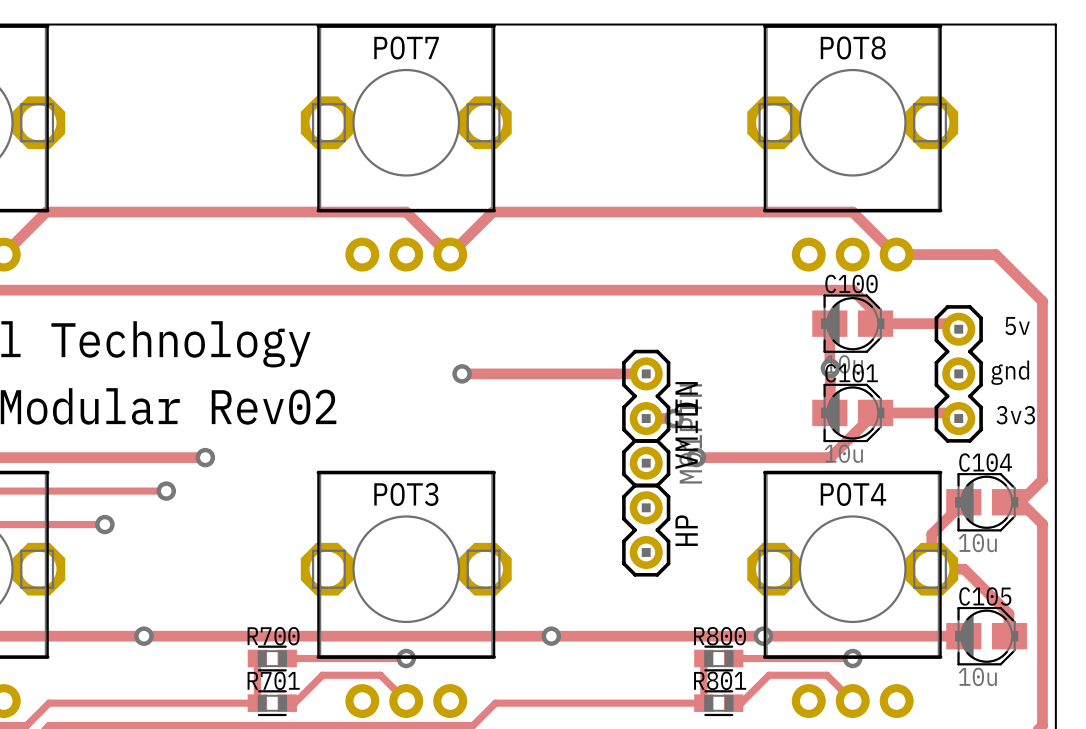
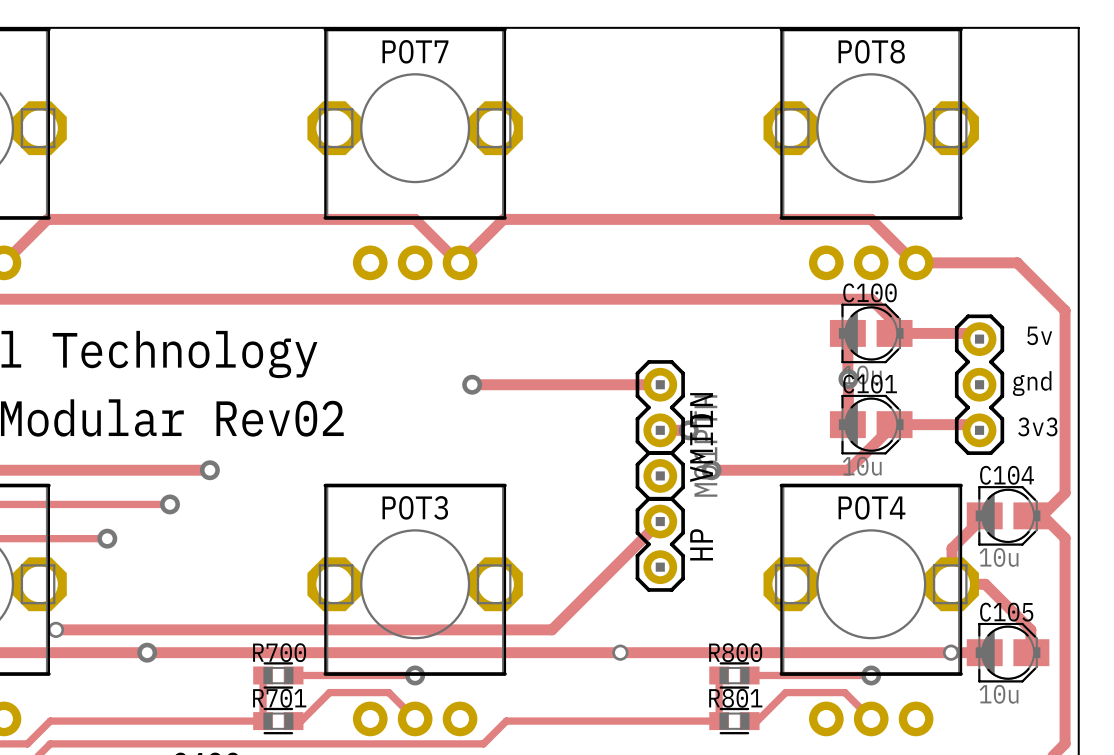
track: none -> (660, 521) (551, 629) (55, 629)
via: none -> (55, 629)
via: (551, 636) -> none
via: none -> (620, 652)
via: (763, 636) -> none
via: none -> (951, 652)

